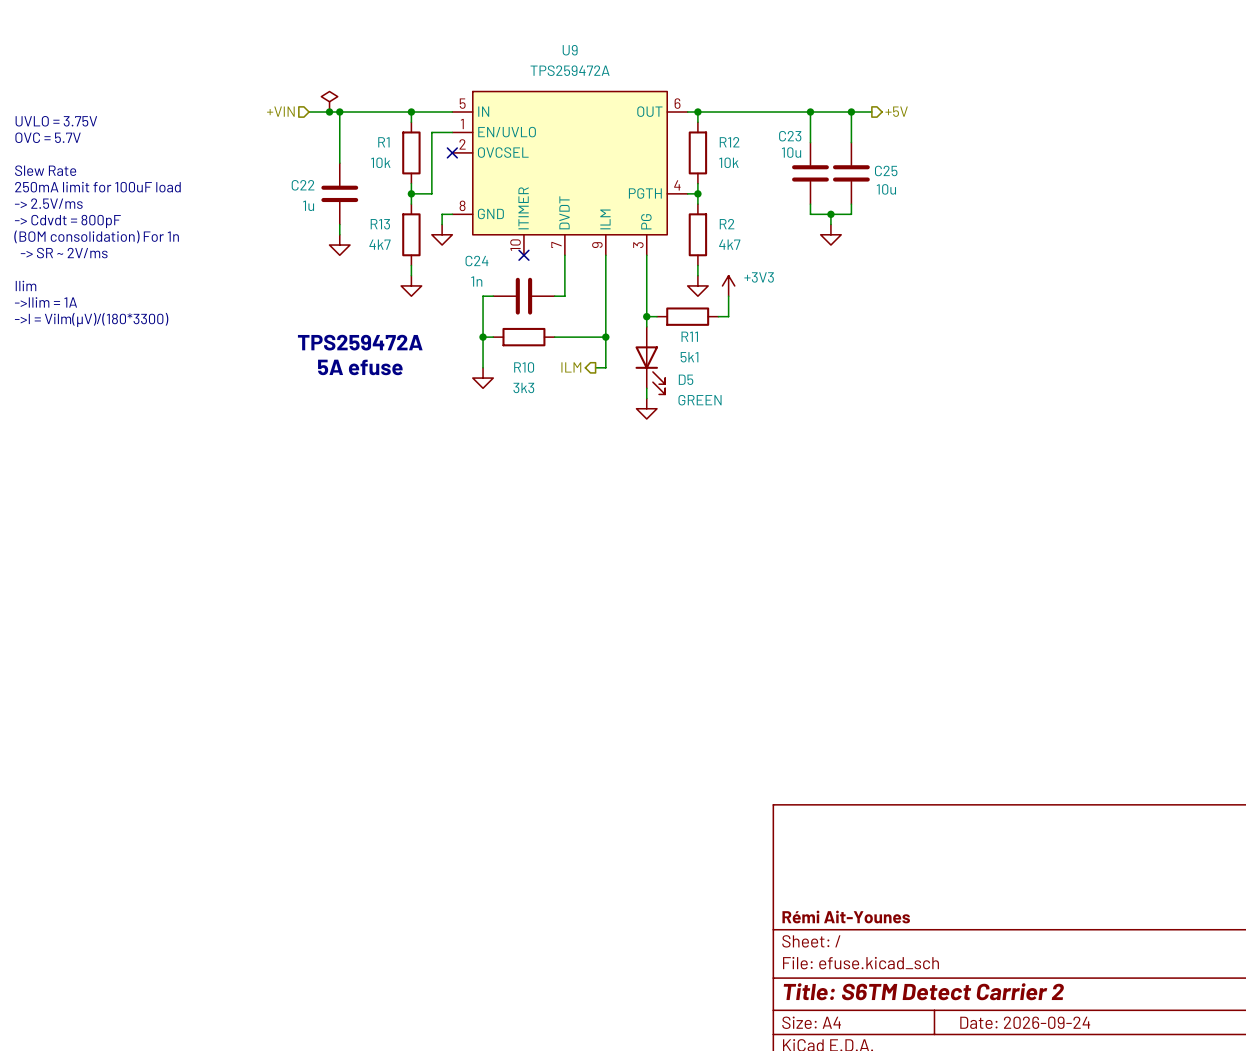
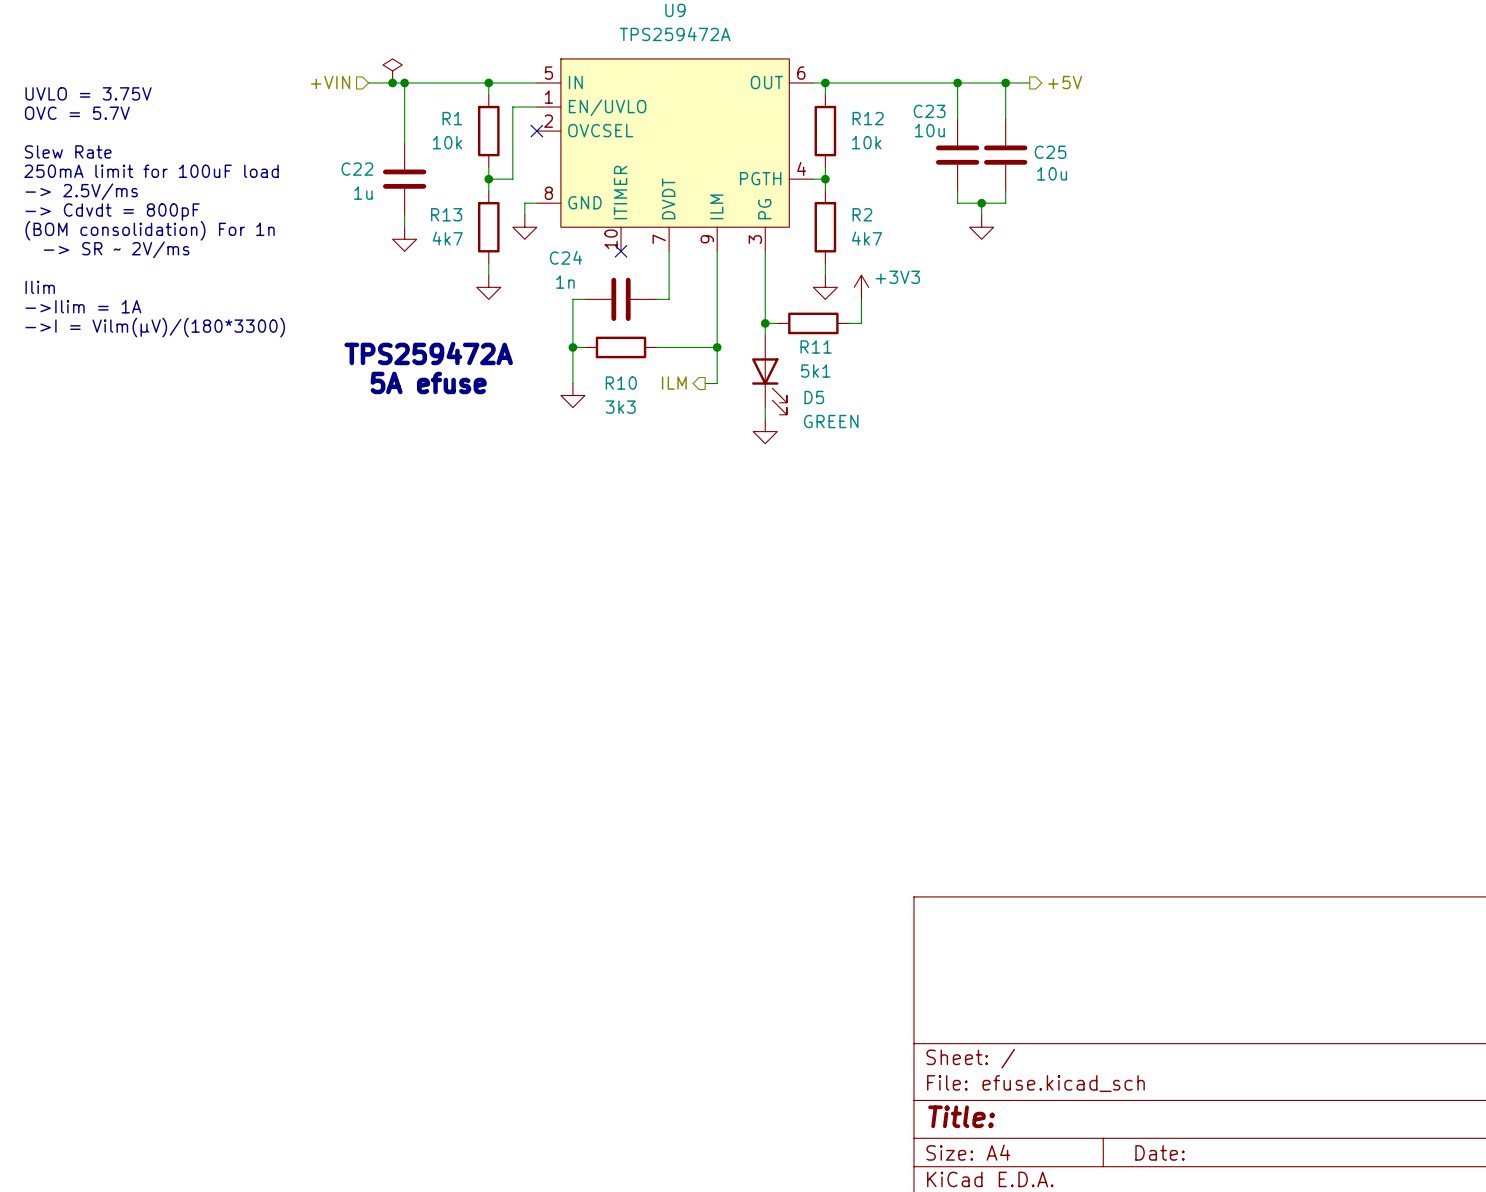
title block: Rémi Ait-Younes (846, 917) -> none
title block: Title: S6TM Detect Carrier 2 (923, 991) -> Title: (961, 1116)
title block: Date: 2026-09-24 (1025, 1022) -> Date: (1160, 1152)

